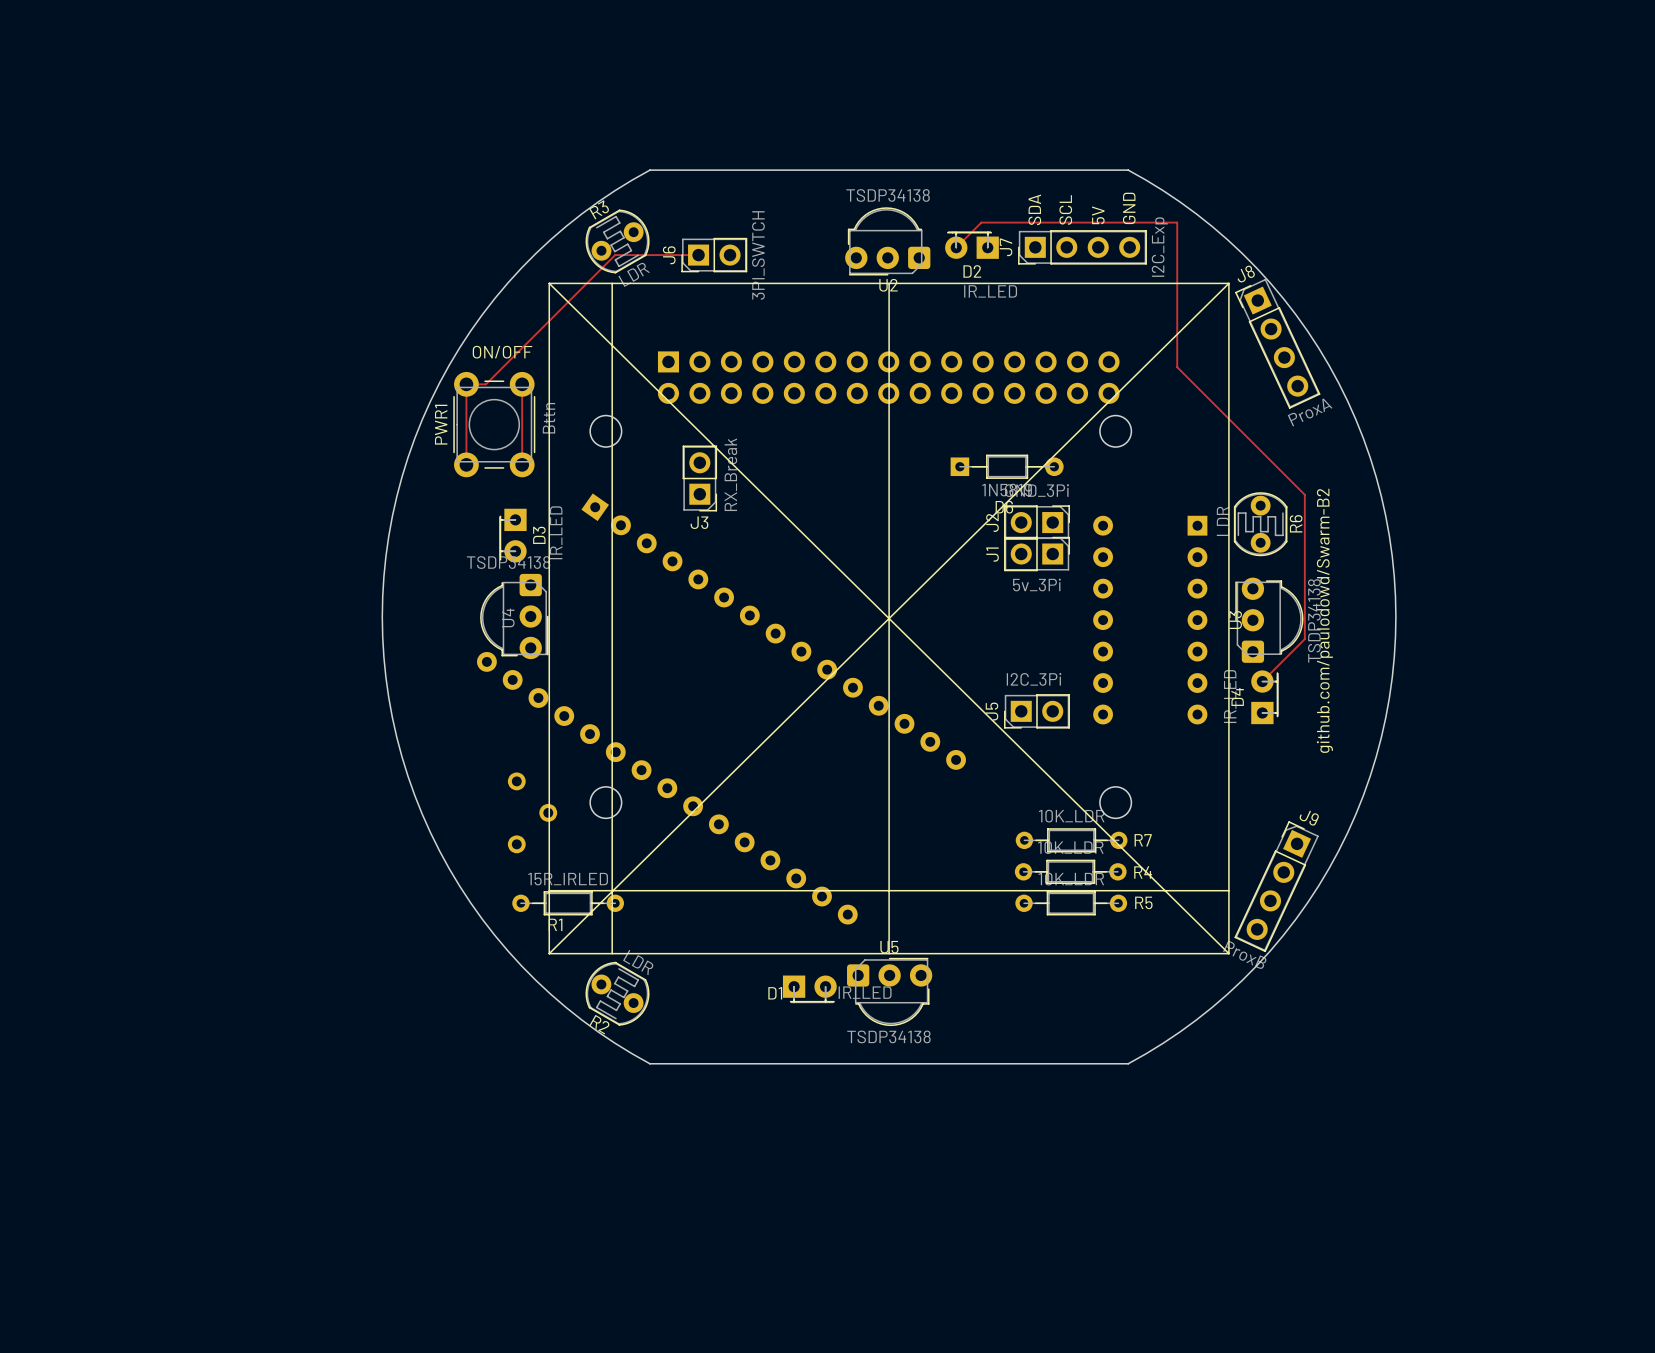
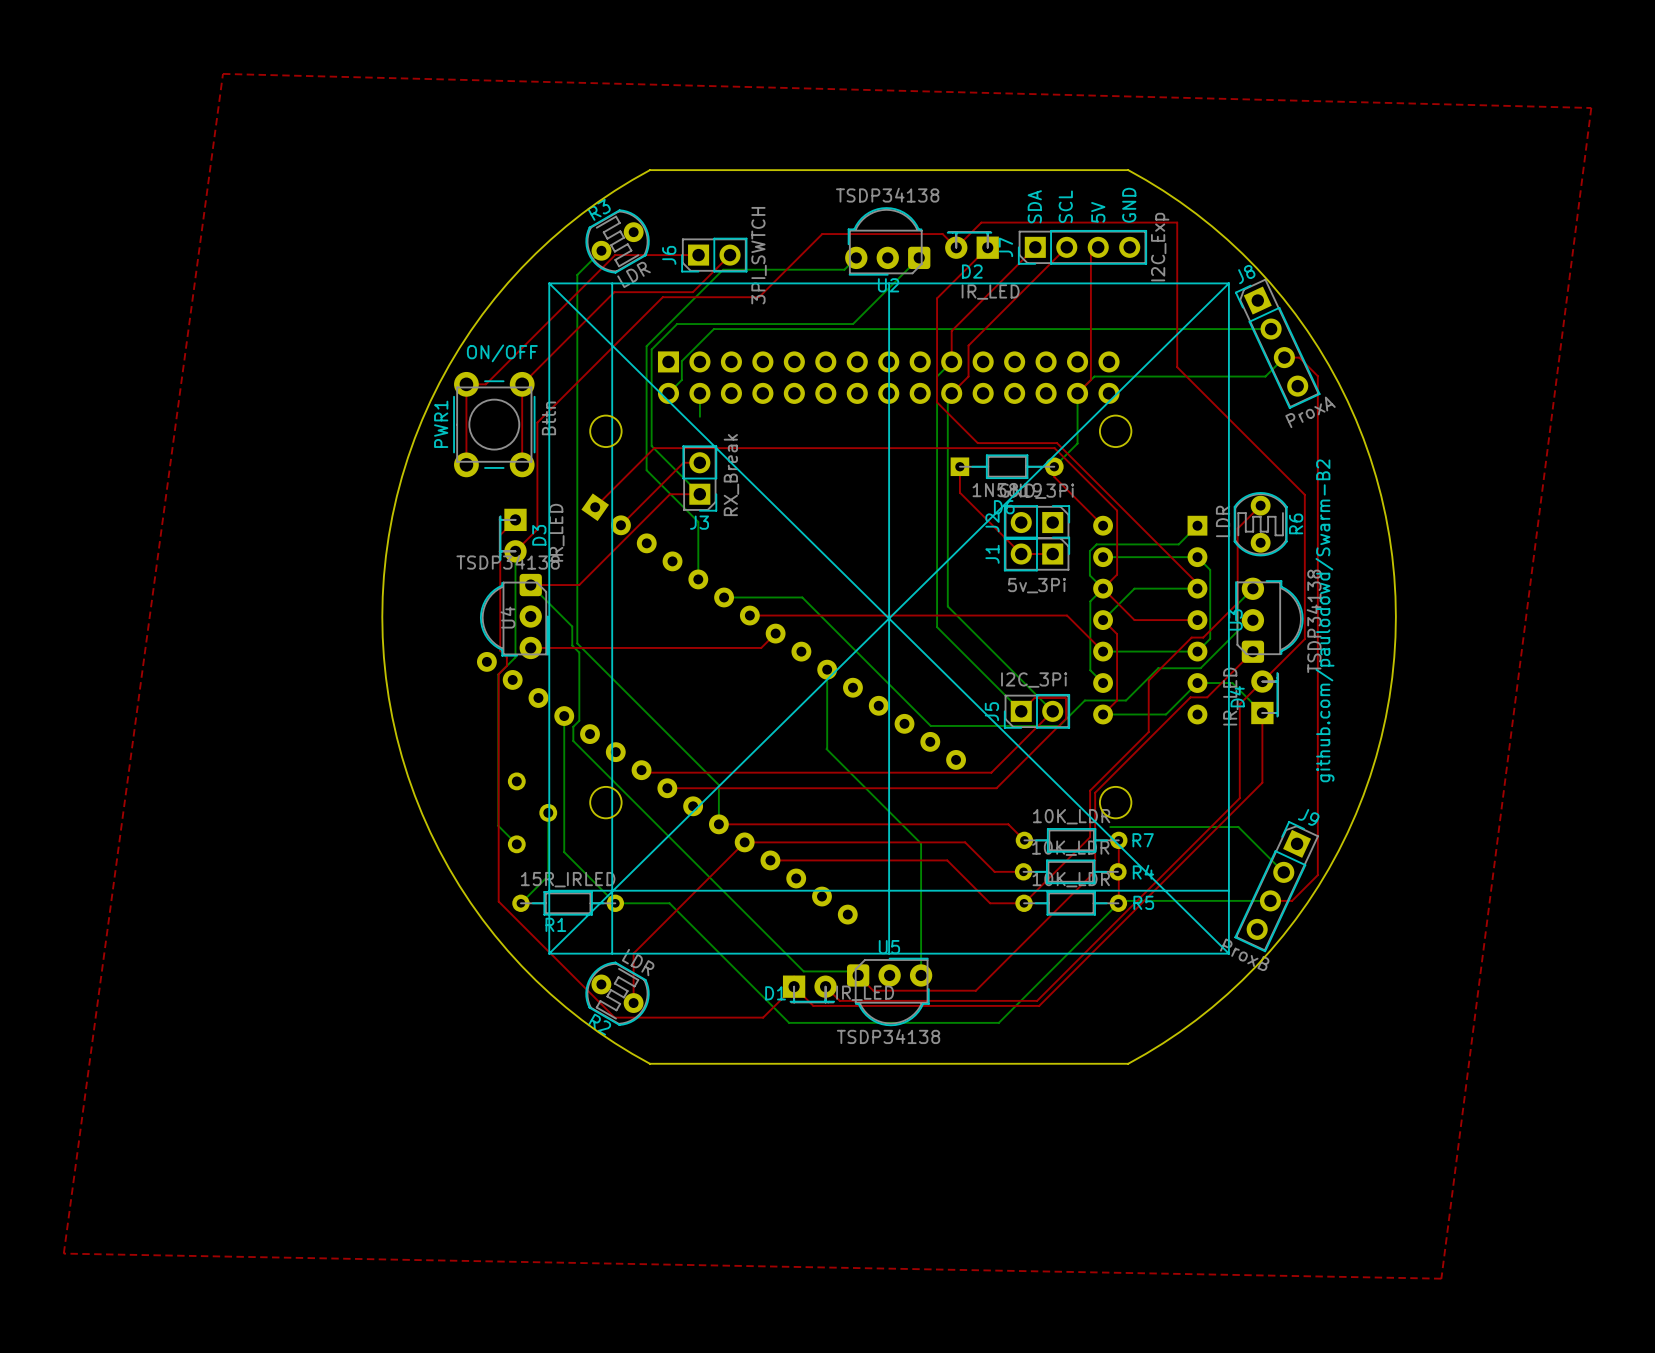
top zone outline: none -> (223, 73) (1591, 107) (1441, 1278) (63, 1253) (223, 73)
top track: none -> (956, 247) (942, 234) (822, 234) (759, 297) (662, 297) (537, 422) (537, 529) (515, 551)
top track: none -> (987, 247) (937, 298) (937, 402) (977, 443) (1057, 443) (1197, 583) (1197, 588)
top track: none -> (1035, 247) (951, 330) (951, 361)
top track: none -> (1066, 247) (968, 345) (968, 376) (951, 393)
top track: none -> (1098, 247) (1090, 254) (1090, 380) (1077, 393)
bottom track: none -> (601, 250) (577, 274) (577, 643) (718, 785) (718, 824)
top track: none -> (730, 255) (692, 292) (614, 292) (522, 384)
bottom track: none -> (856, 257) (844, 269) (723, 269) (646, 346) (646, 470) (698, 521) (698, 579)
bottom track: none -> (919, 257) (853, 324) (677, 324) (651, 349) (651, 446) (699, 494)
bottom track: none -> (1271, 329) (713, 329) (681, 361) (681, 380) (668, 393)
top track: none -> (1284, 357) (1299, 357) (1317, 376) (1317, 875) (1292, 900) (1270, 900)
bottom track: none -> (1284, 357) (1265, 376) (1094, 376) (1077, 393) (1077, 443) (1054, 466)
bottom track: none -> (951, 361) (937, 376) (937, 627) (1021, 711)
bottom track: none -> (699, 393) (699, 416)
bottom track: none -> (951, 393) (947, 397) (947, 606) (1052, 711)
top track: none -> (699, 462) (683, 462) (620, 525)
top track: none -> (959, 466) (959, 492) (1021, 554) (1052, 554)
top track: none -> (1054, 466) (1054, 476) (1103, 525)
top track: none -> (699, 494) (670, 494) (579, 585) (530, 585)
top track: none -> (1260, 505) (1237, 528) (1237, 603) (1203, 637) (1191, 637) (1148, 680) (1148, 732) (1090, 790) (1090, 837) (1024, 903) (990, 903) (947, 860) (770, 860)
top track: none -> (595, 507) (654, 448) (1054, 448) (1117, 510) (1117, 574) (1103, 588) (1134, 620) (1197, 620)
top track: none -> (515, 519) (500, 535) (500, 650) (506, 657) (506, 665) (498, 674) (498, 901) (614, 1017) (763, 1017) (794, 986)
bottom track: none -> (1197, 525) (1178, 544) (1096, 544) (1089, 551) (1089, 575) (1103, 588) (1090, 601) (1090, 670) (1103, 683)
bottom track: none -> (515, 551) (515, 657) (498, 674) (498, 825) (516, 844)
bottom track: none -> (1103, 557) (1197, 557) (1210, 569) (1210, 638) (1197, 651) (1103, 651)
bottom track: none -> (530, 585) (572, 626) (572, 645) (579, 652) (579, 720) (573, 726) (573, 741) (803, 971) (854, 971) (858, 975)
bottom track: none -> (1197, 588) (1134, 588) (1103, 620)
bottom track: none -> (1252, 588) (1237, 604) (1237, 631) (1200, 668) (1158, 668) (1126, 700) (1084, 700) (1059, 725) (930, 725) (802, 597) (724, 597)
top track: none -> (749, 615) (1067, 615) (1103, 651)
top track: none -> (1103, 620) (1117, 634) (1117, 700) (1103, 714)
top track: none -> (775, 633) (761, 647) (530, 647)
top track: none -> (1252, 651) (1207, 697) (1190, 697) (1095, 792) (1095, 871) (975, 990) (873, 990) (858, 975)
bottom track: none -> (827, 669) (826, 749) (921, 843) (921, 975)
top track: none -> (1262, 681) (1239, 704) (1239, 798) (1037, 1000) (839, 1000) (825, 986)
top track: none -> (1021, 711) (1034, 697) (1066, 698) (1066, 718) (996, 788) (667, 788)
top track: none -> (1052, 711) (991, 772) (644, 772) (641, 770)
top track: none -> (1262, 713) (1262, 782) (1039, 1005) (813, 1005) (794, 986)
bottom track: none -> (1262, 713) (1232, 683) (1197, 683) (1166, 714) (1103, 714)
bottom track: none -> (564, 716) (564, 852) (615, 903) (669, 903) (789, 1022) (998, 1022) (1120, 900) (1270, 900)
bottom track: none -> (548, 812) (548, 875) (520, 903)
top track: none -> (718, 824) (1008, 824) (1024, 840)
bottom track: none -> (1110, 827) (1238, 827) (1283, 872)
top track: none -> (1118, 840) (1118, 903)
top track: none -> (1023, 871) (994, 871) (965, 842) (744, 842) (633, 953) (633, 1003)

